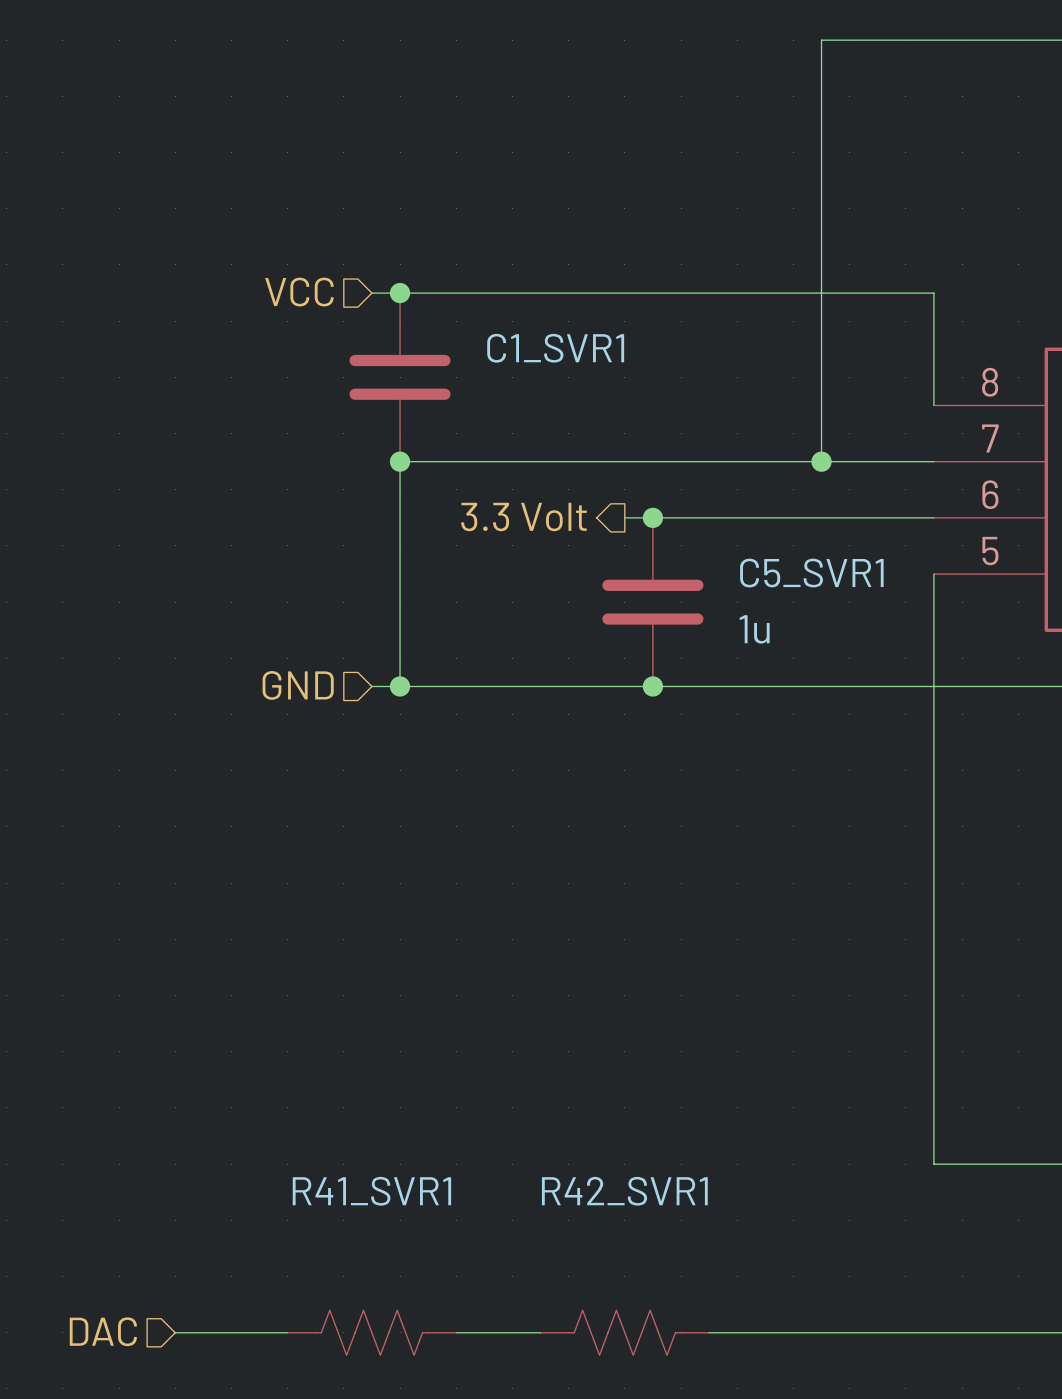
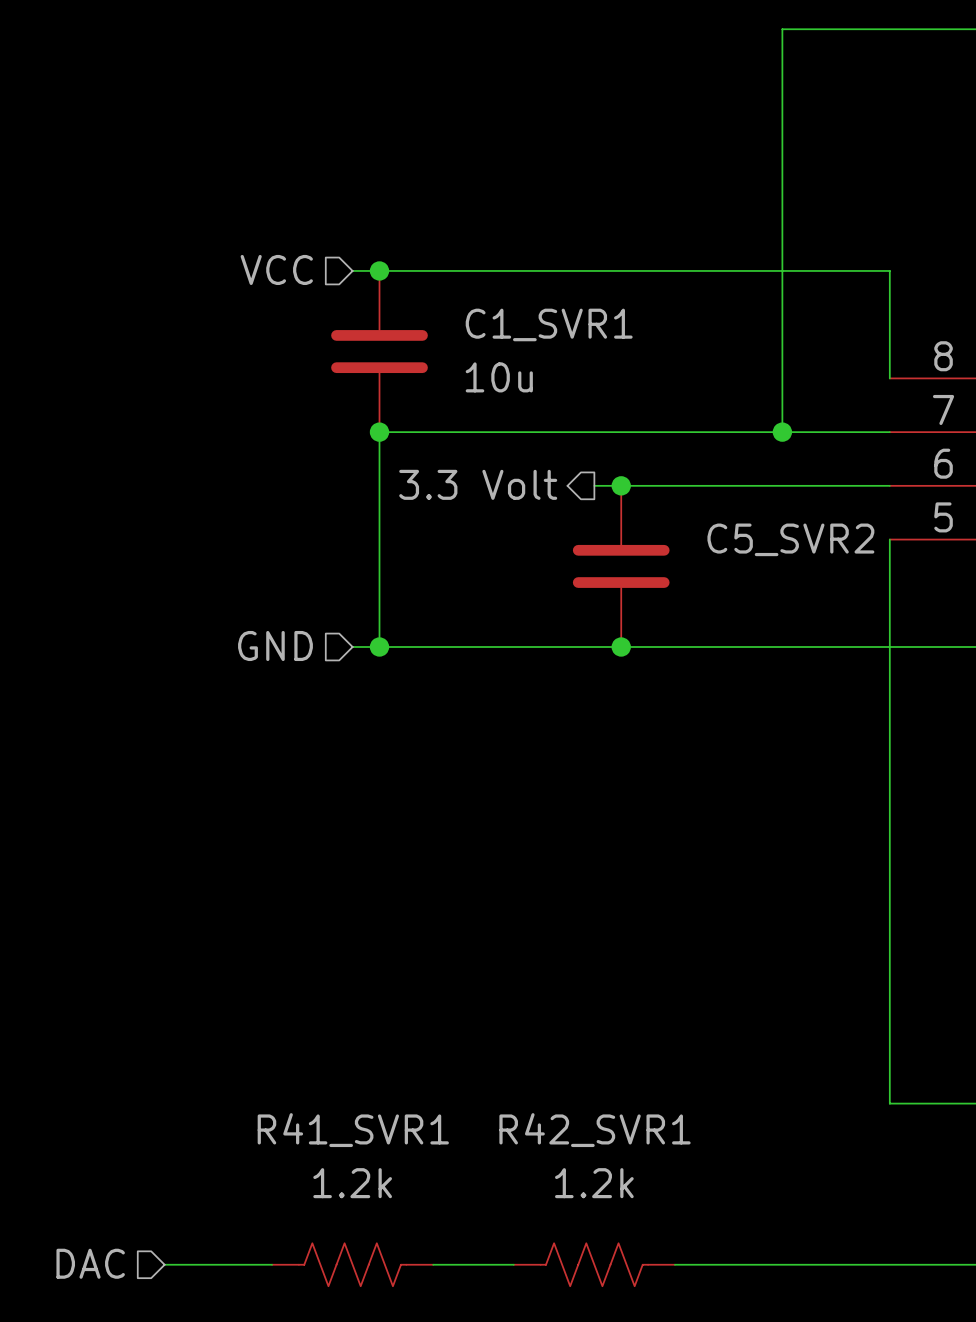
C1_SVR1 value: none -> 10u (499, 377)
C5_SVR1 name: C5_SVR1 (811, 573) -> C5_SVR2 (790, 539)
C5_SVR1 value: 1u (754, 629) -> none
R41_SVR1 value: none -> 1.2k (352, 1183)
R42_SVR1 value: none -> 1.2k (594, 1183)

